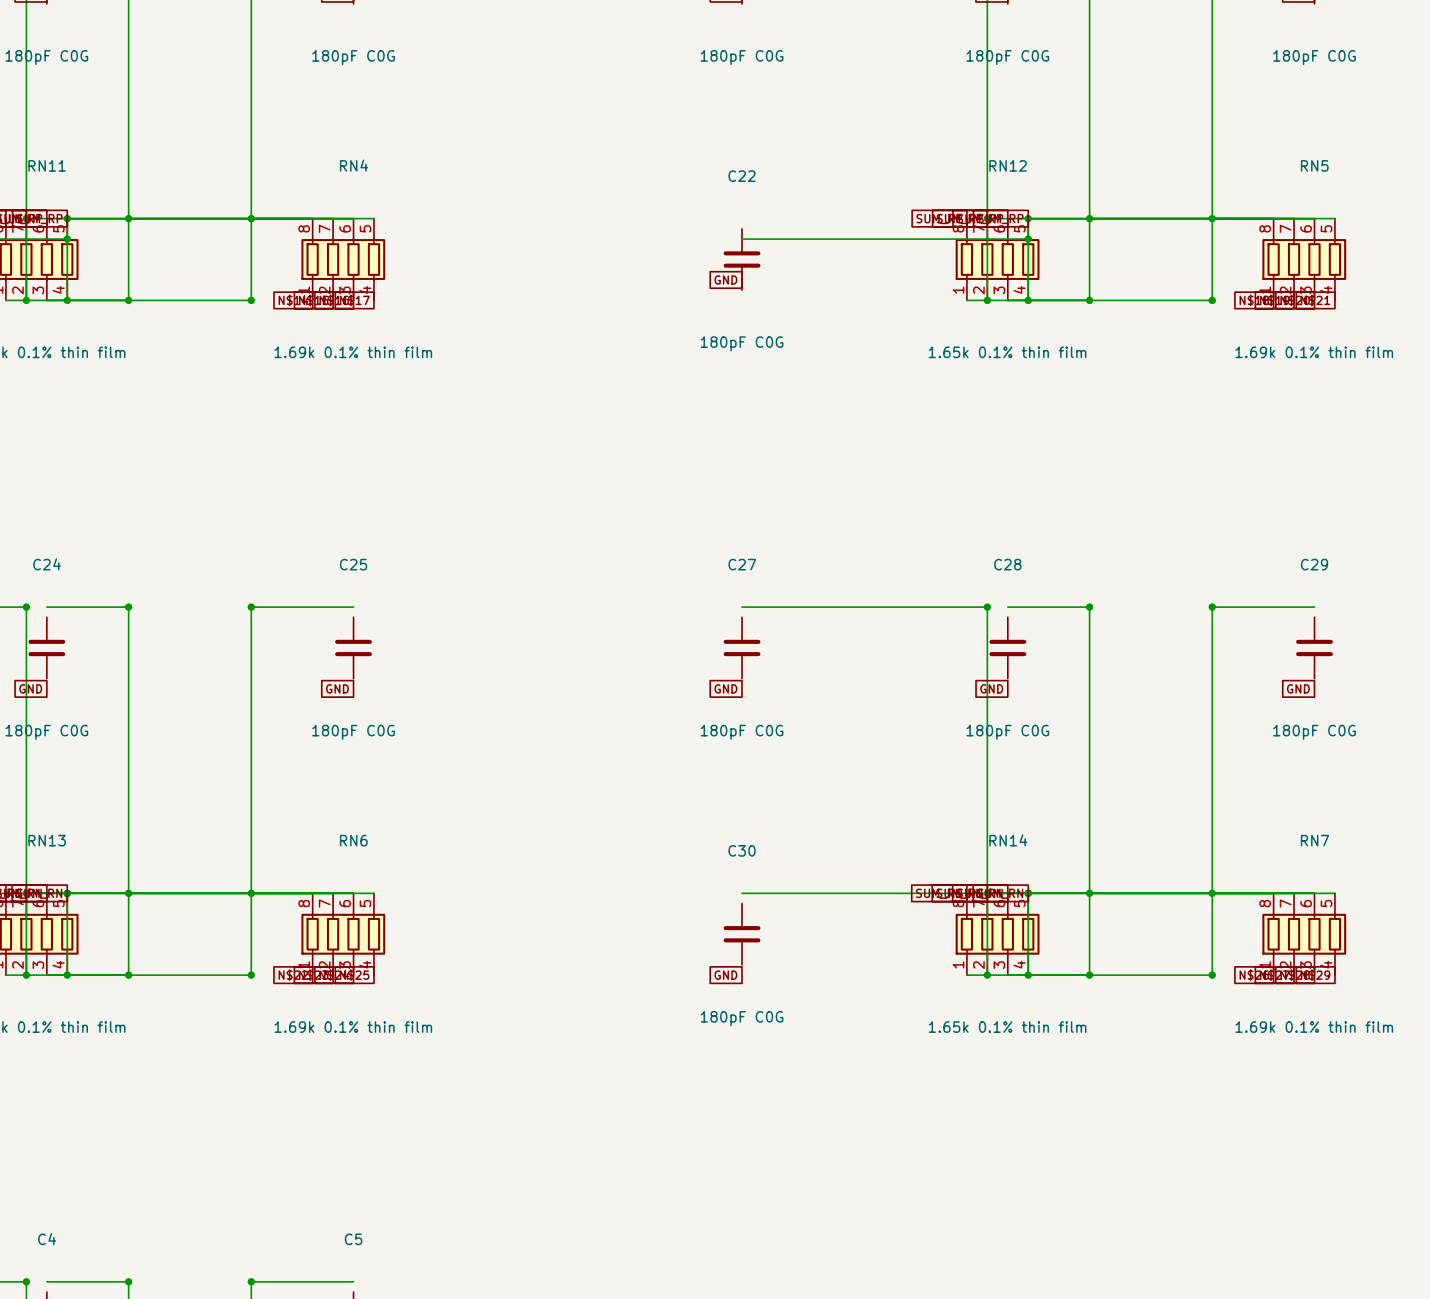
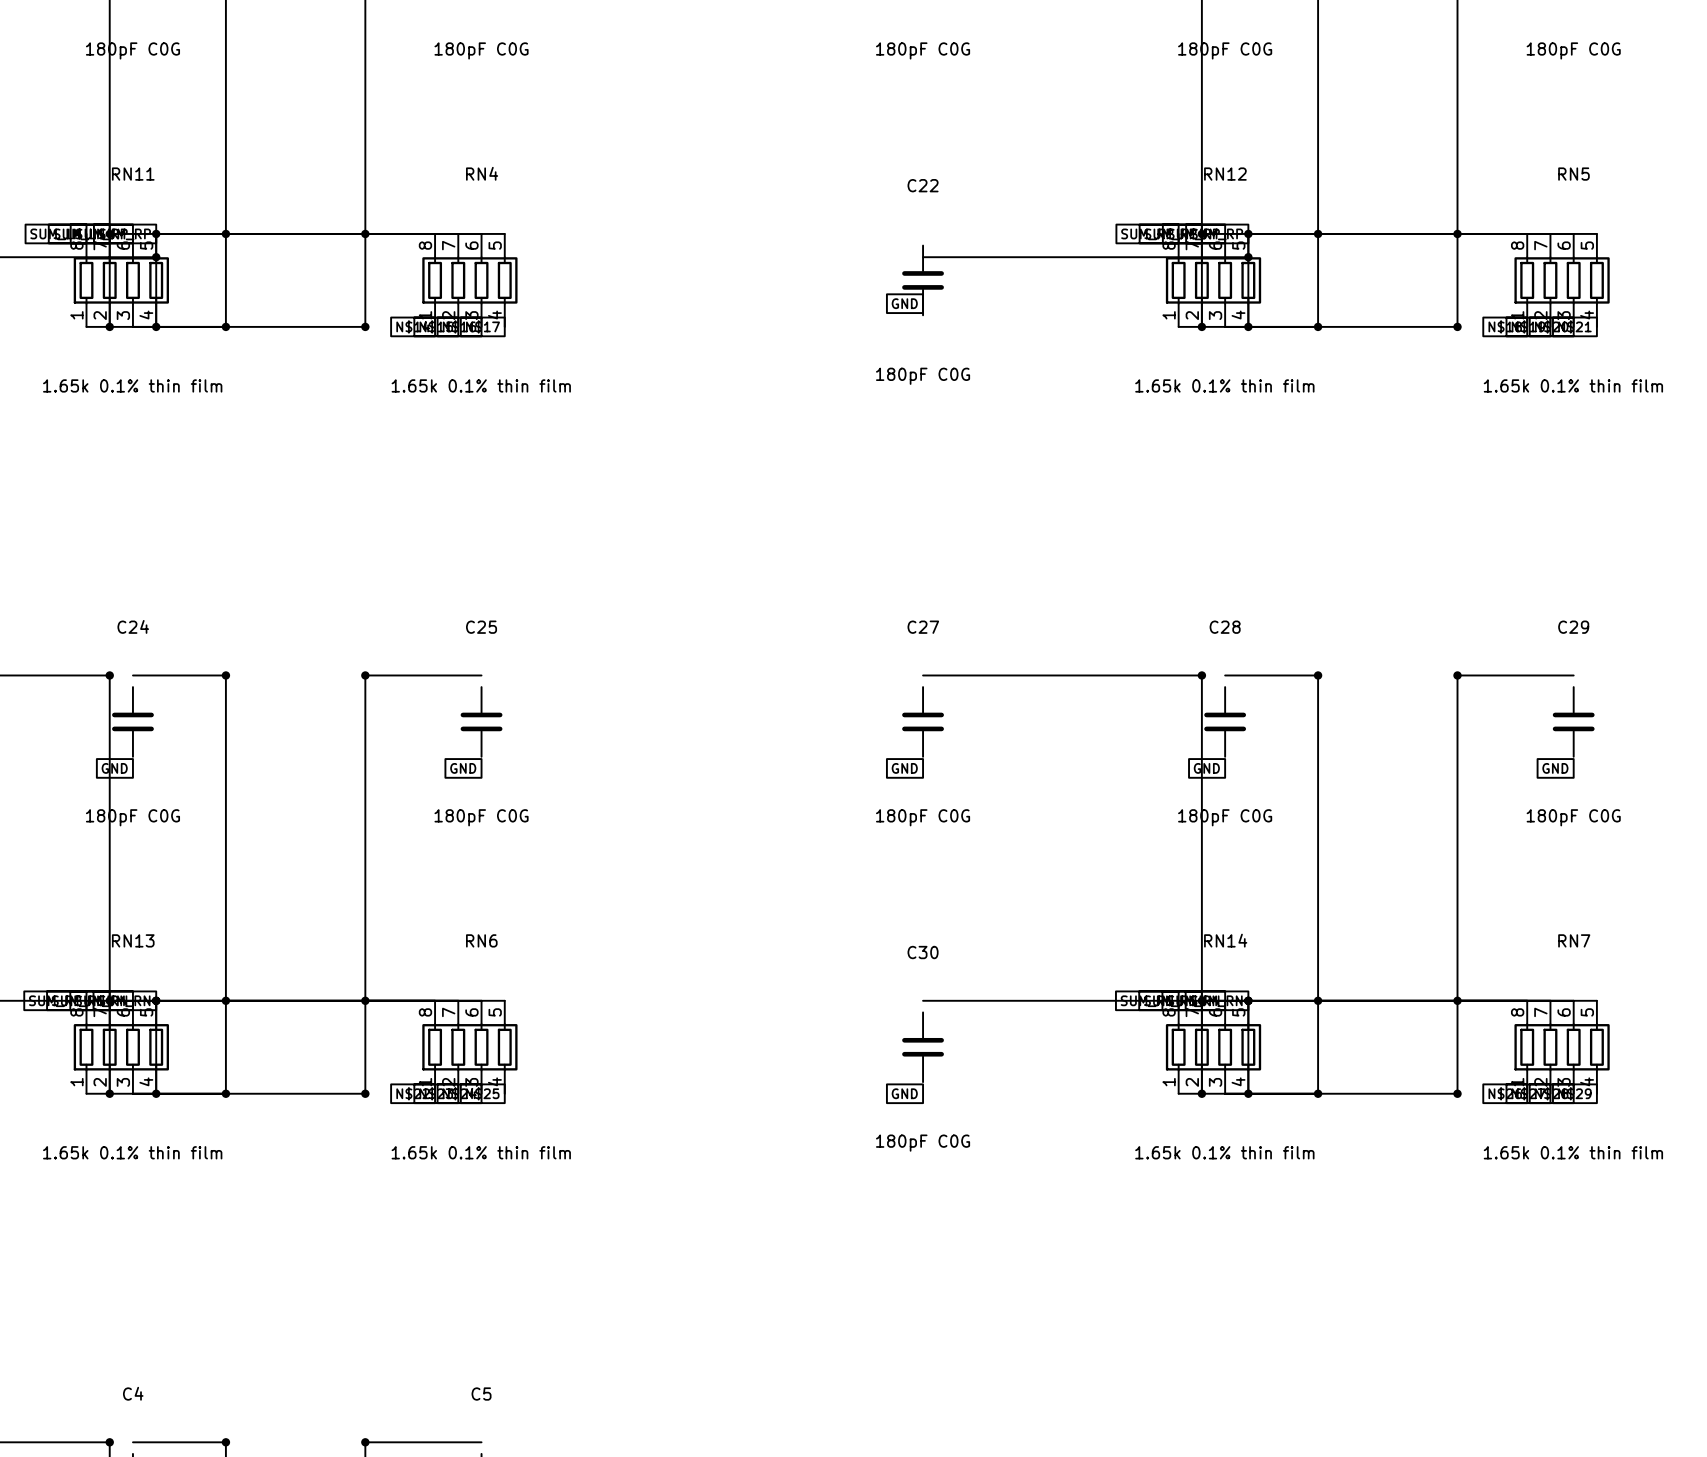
RN4 value: 1.69k 0.1% thin film (353, 352) -> 1.65k 0.1% thin film (481, 385)
RN5 value: 1.69k 0.1% thin film (1314, 352) -> 1.65k 0.1% thin film (1573, 385)
RN6 value: 1.69k 0.1% thin film (353, 1027) -> 1.65k 0.1% thin film (481, 1152)
RN7 value: 1.69k 0.1% thin film (1314, 1027) -> 1.65k 0.1% thin film (1573, 1152)

